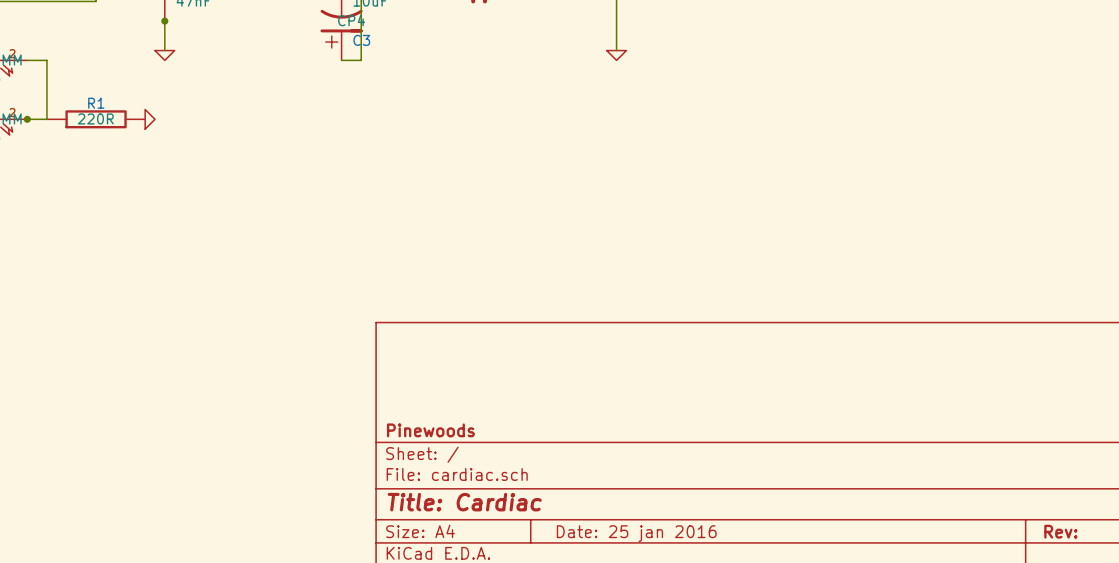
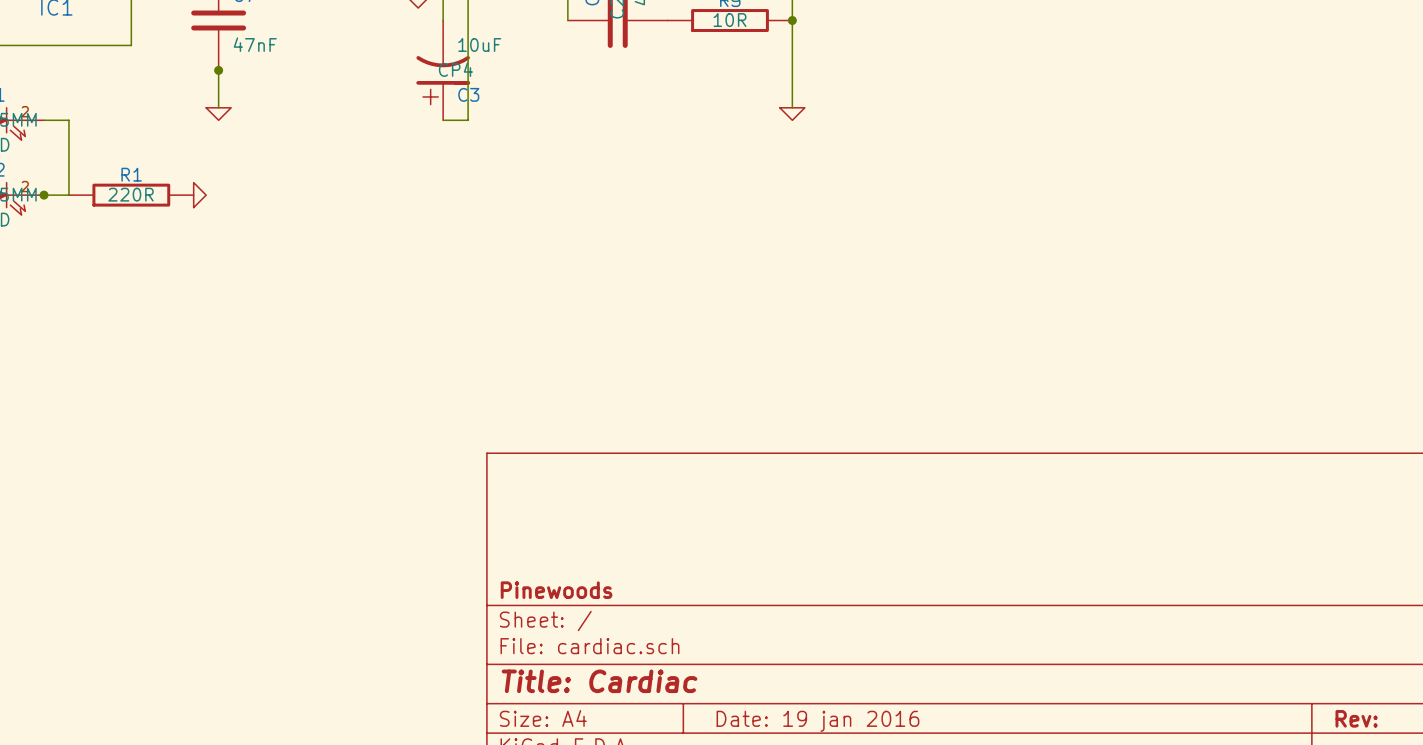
title block: Date: 25 jan 2016 (636, 533) -> Date: 19 jan 2016 (817, 721)

